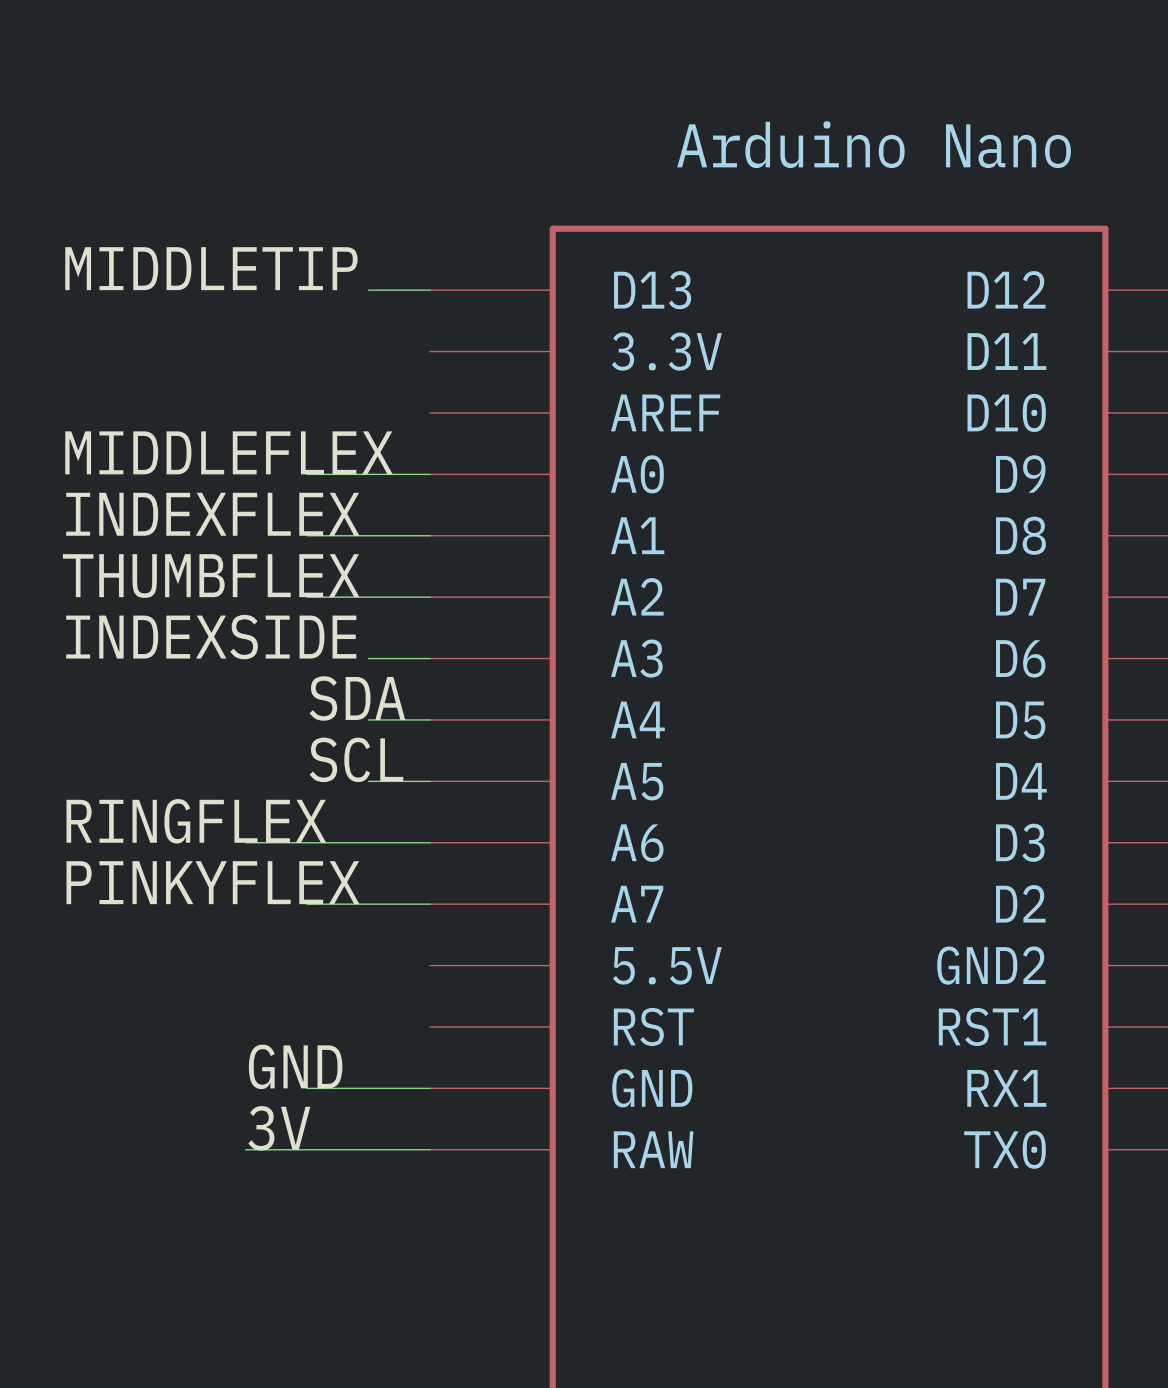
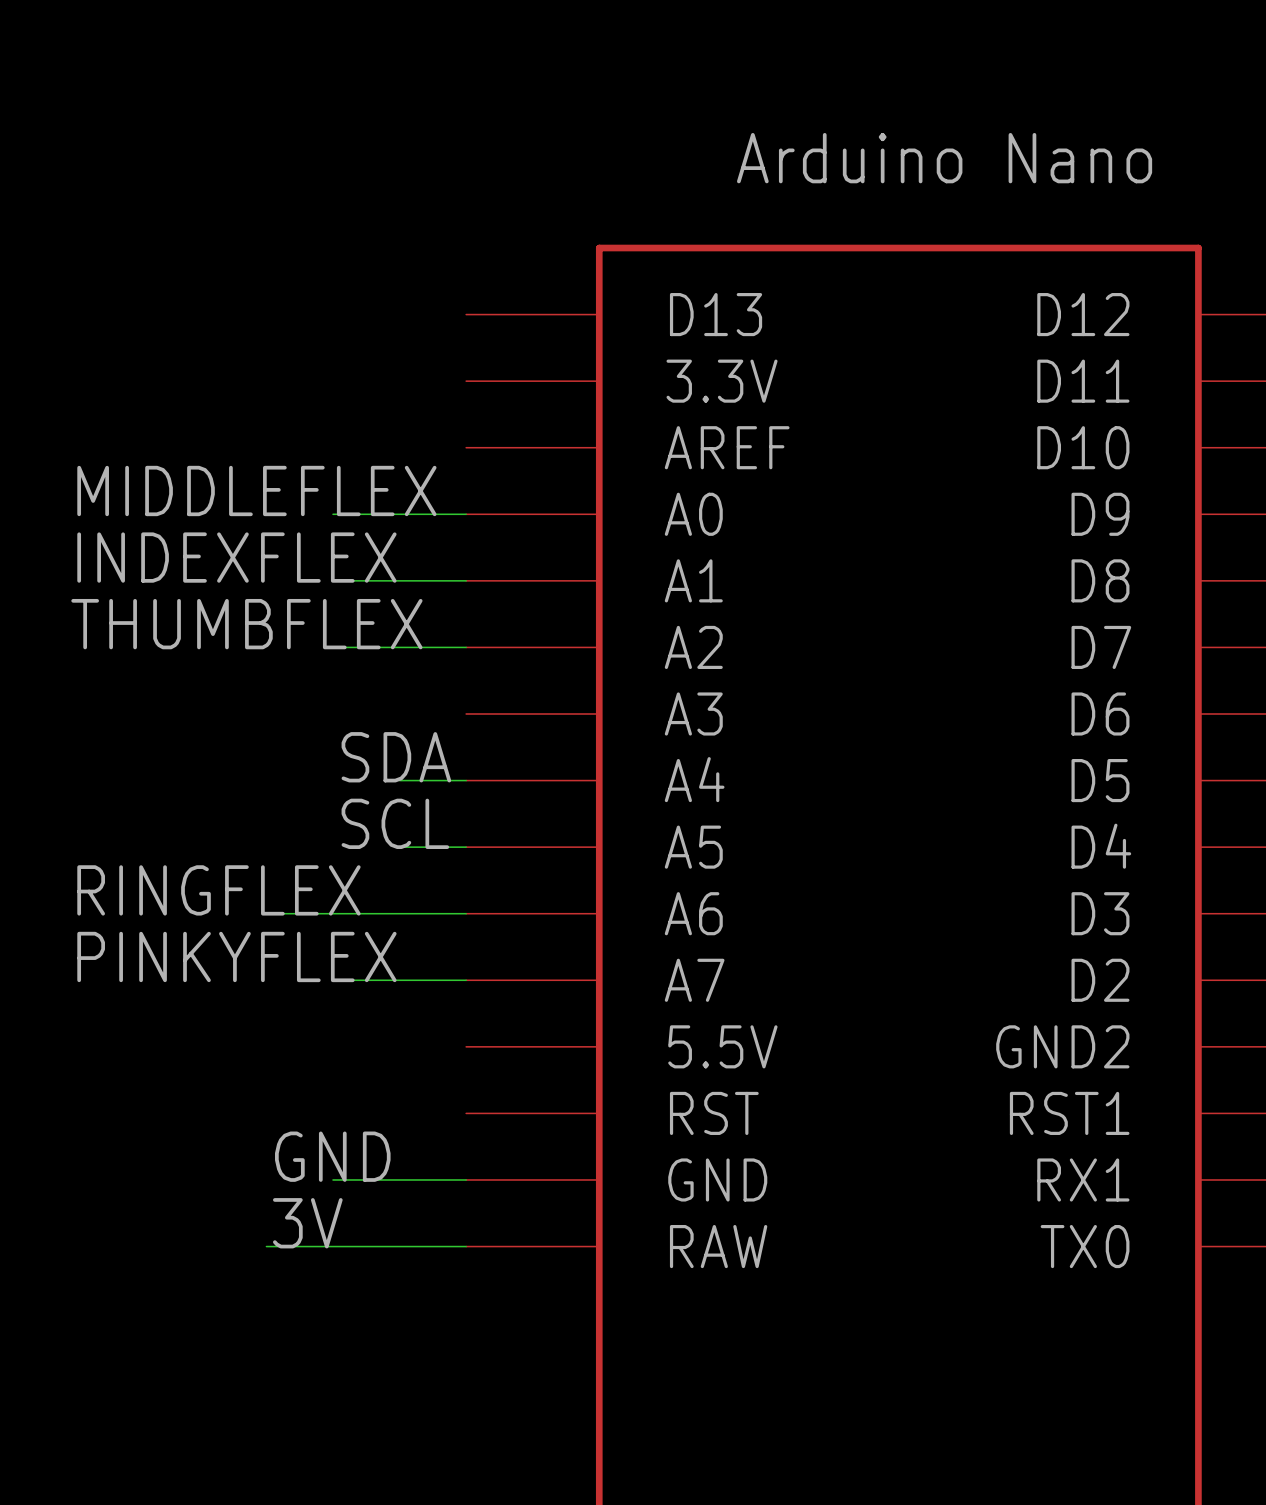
label: MIDDLETIP (211, 268) -> none
wire: (368, 290) (429, 290) -> none
label: INDEXSIDE (211, 637) -> none
wire: (368, 658) (429, 658) -> none

